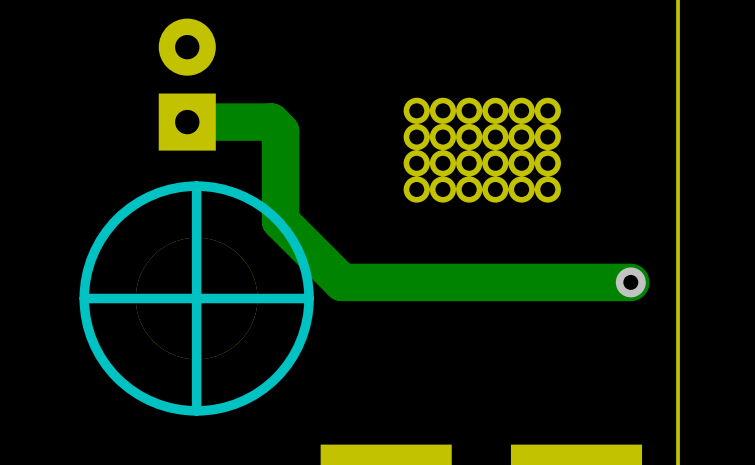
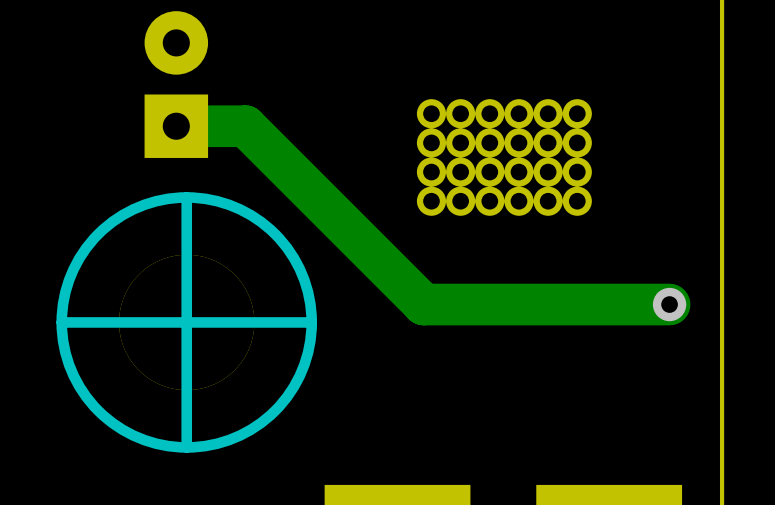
track: (249, 122) (271, 122) (280, 131) (280, 220) (341, 282) (409, 282) -> (245, 126) (423, 304)

